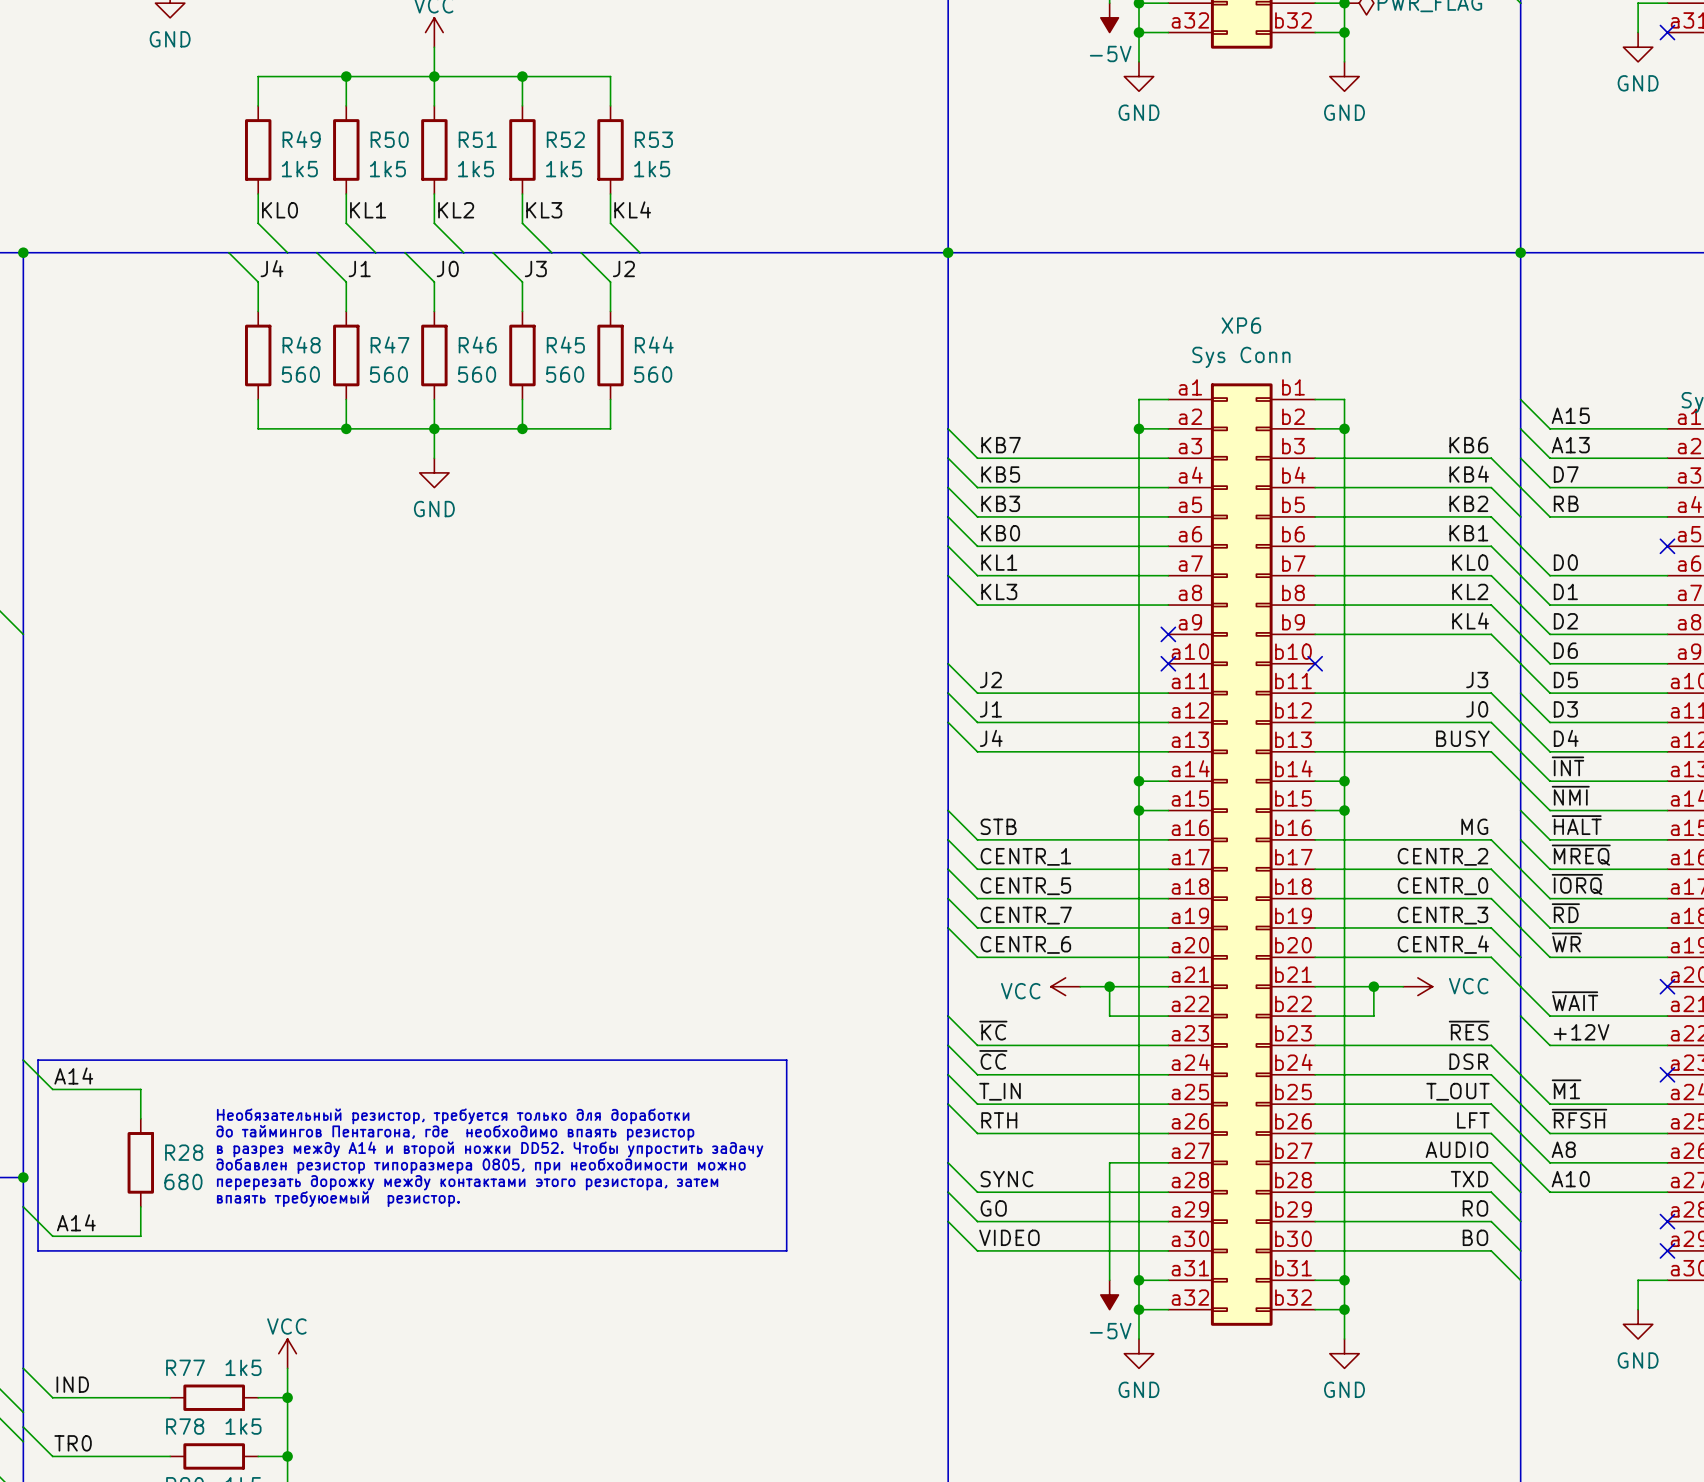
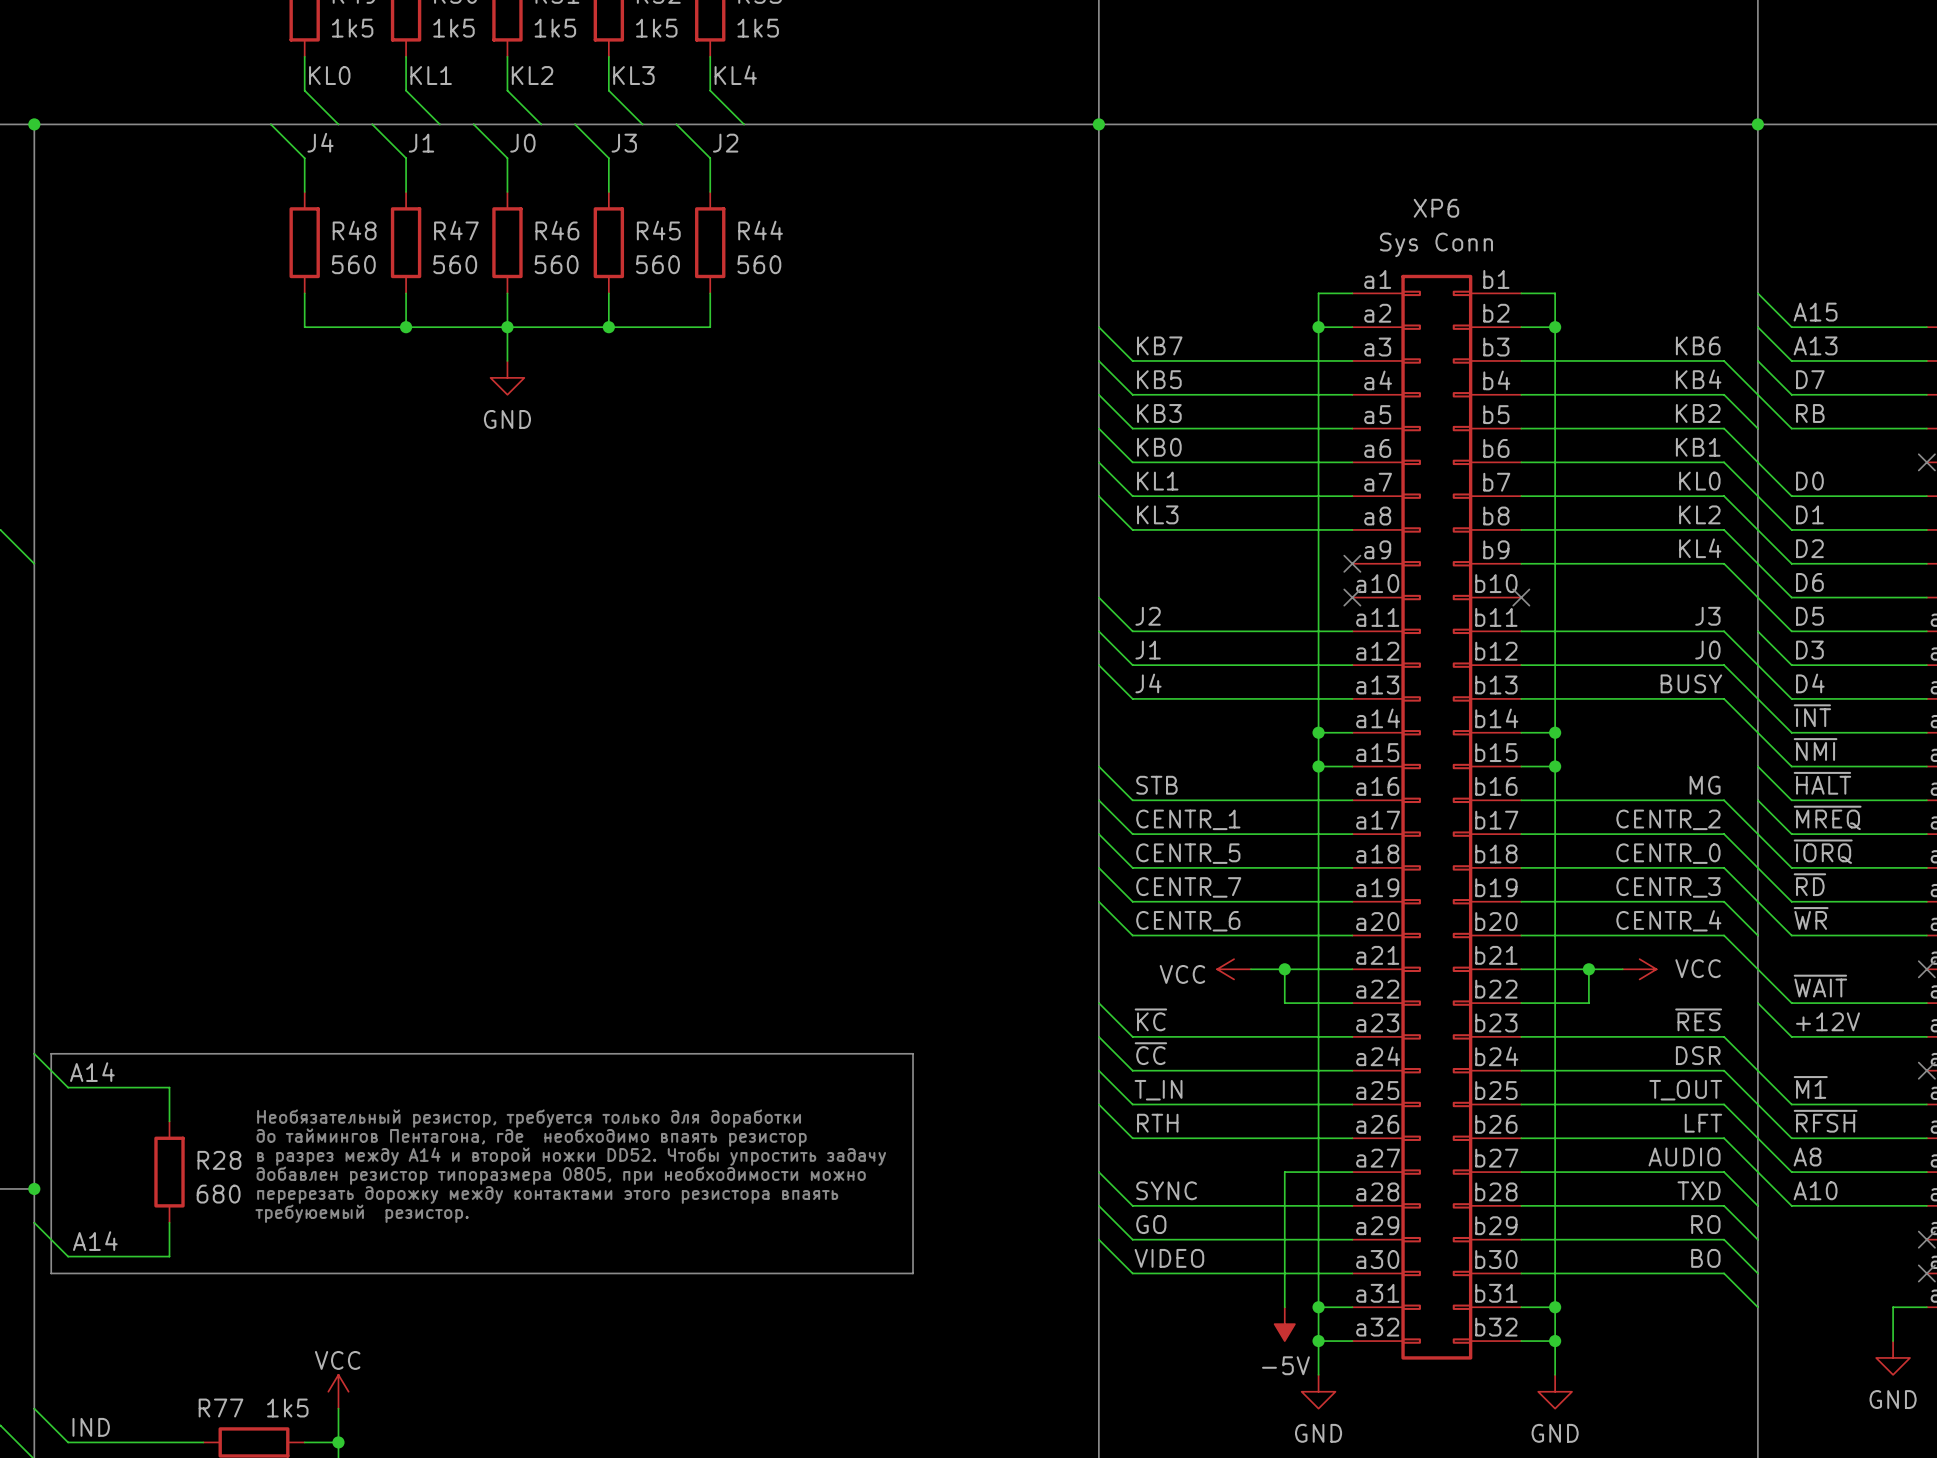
text: перерезать дорожку между контактами этого резистора, затем (467, 1182) -> перерезать дорожку между контактами этого резистора впаять (547, 1195)
text: впаять требуюемый резистор. (338, 1199) -> требуюемый резистор. (362, 1213)

